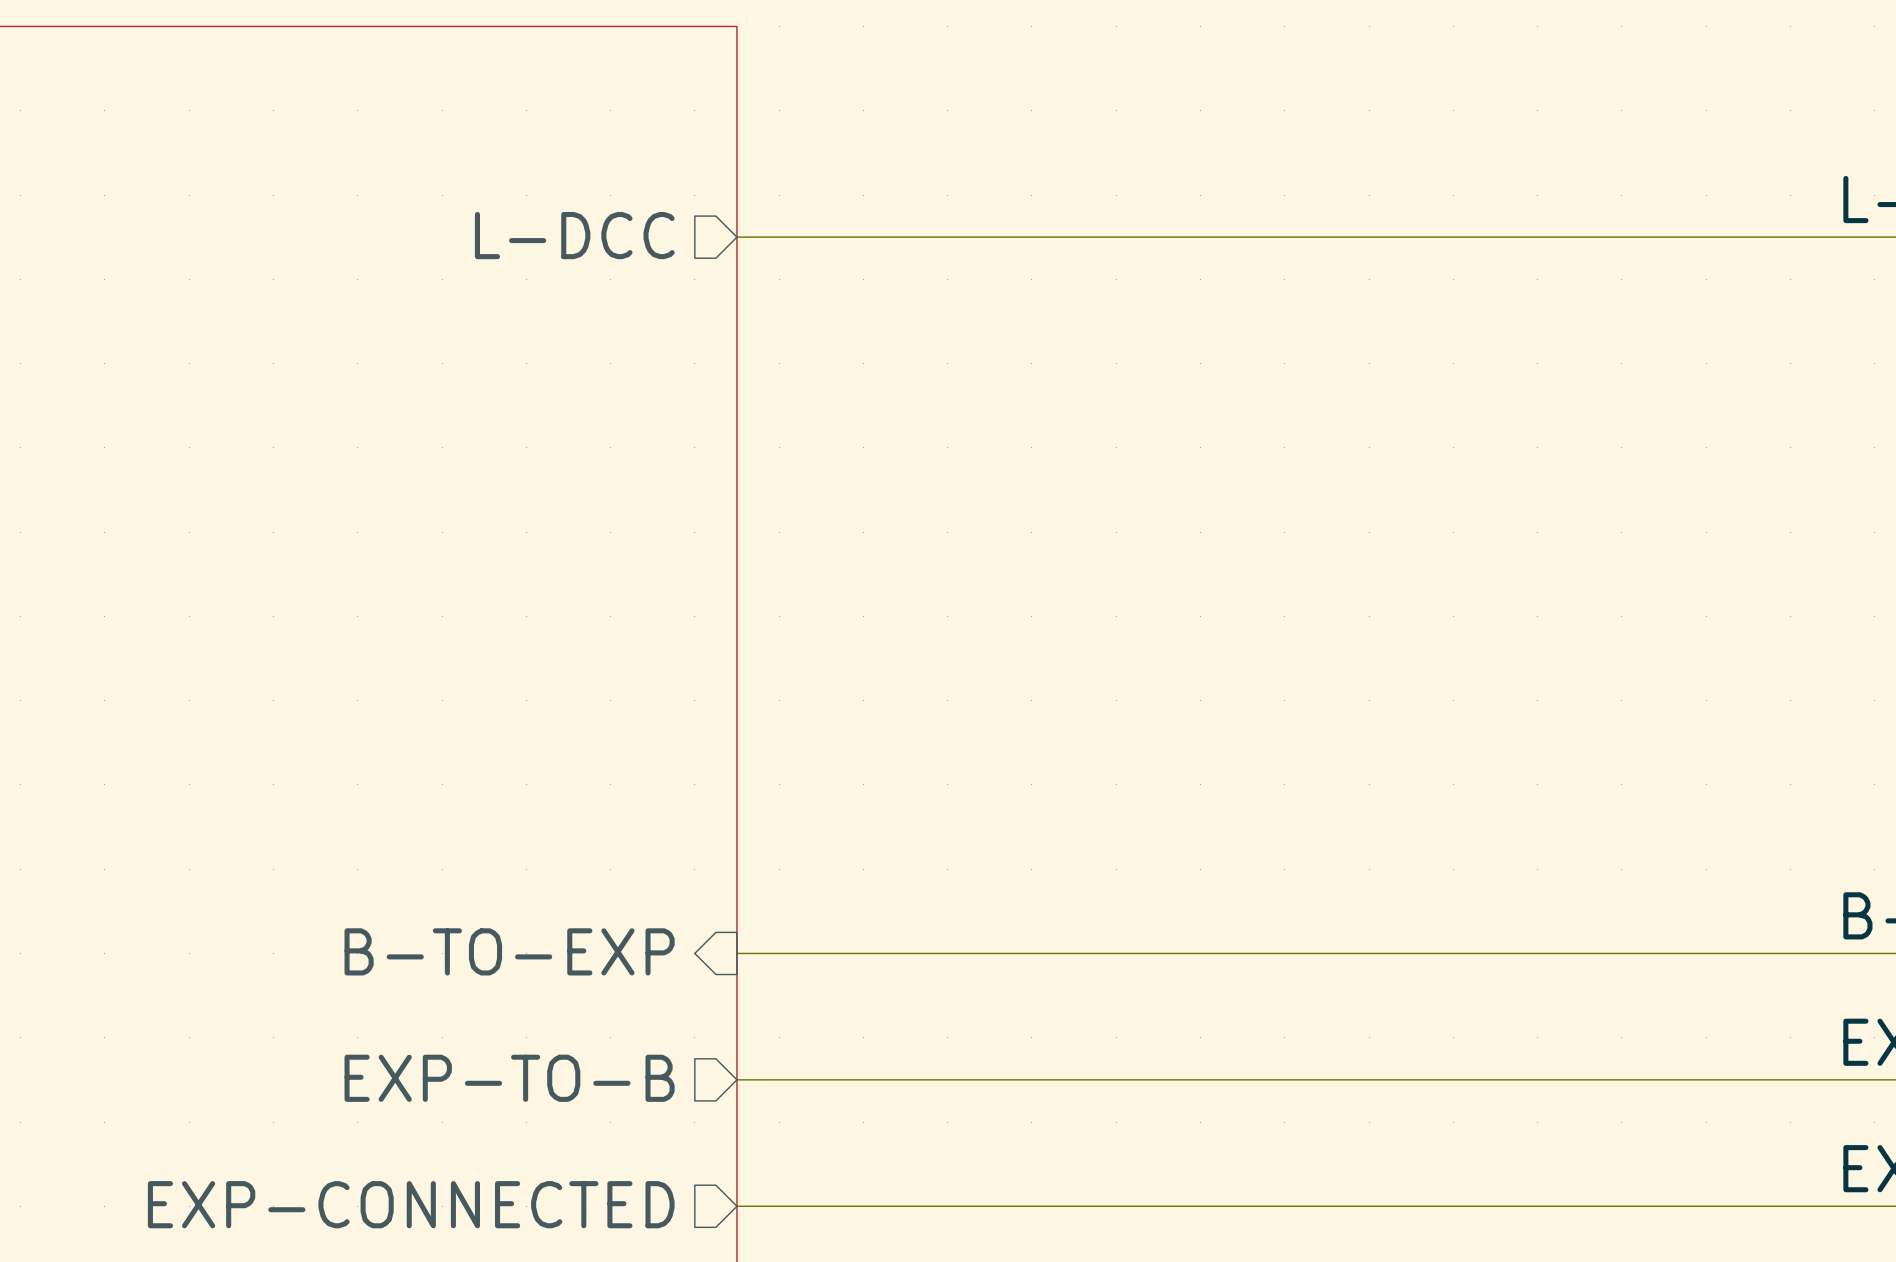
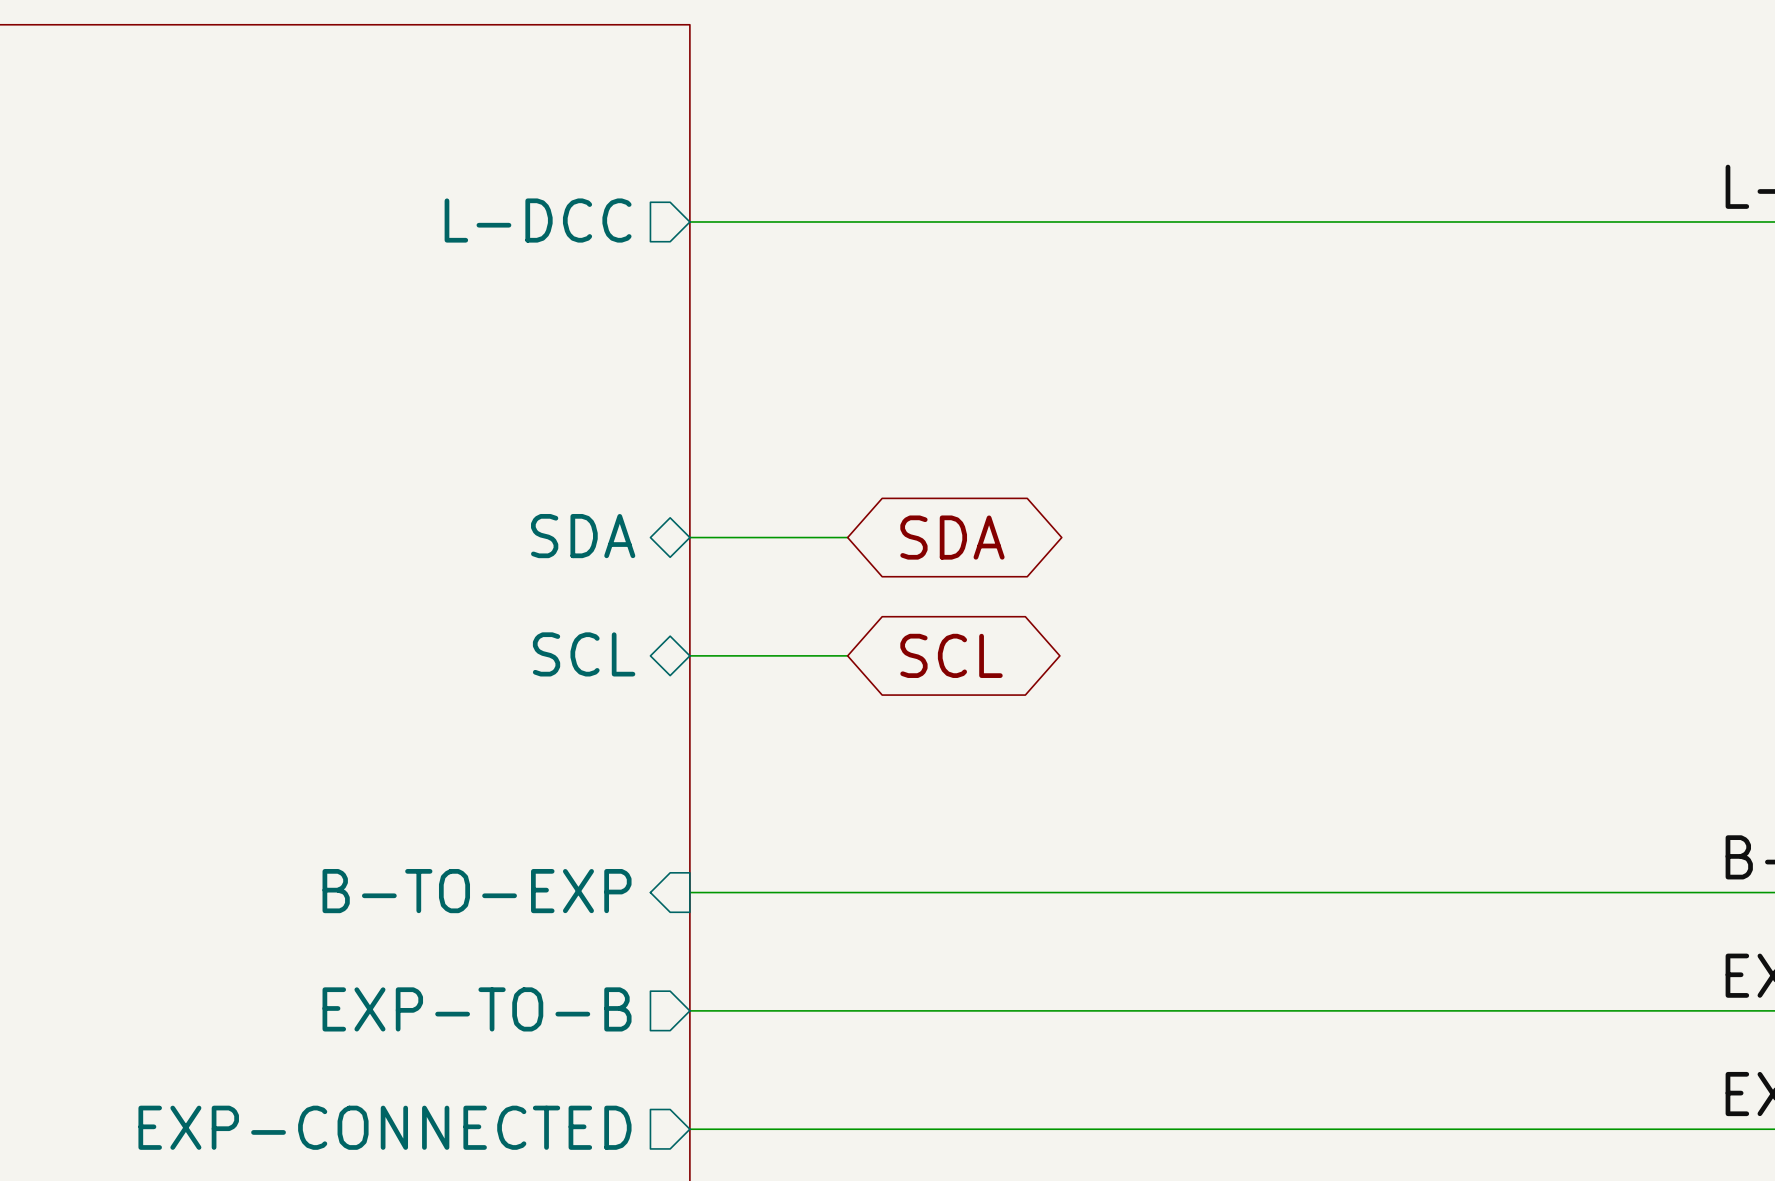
sheet pin: none -> SDA (583, 536)
wire: none -> (689, 537) (847, 537)
global label: none -> SDA (952, 537)
sheet pin: none -> SCL (584, 654)
wire: none -> (689, 655) (847, 655)
global label: none -> SCL (951, 655)

